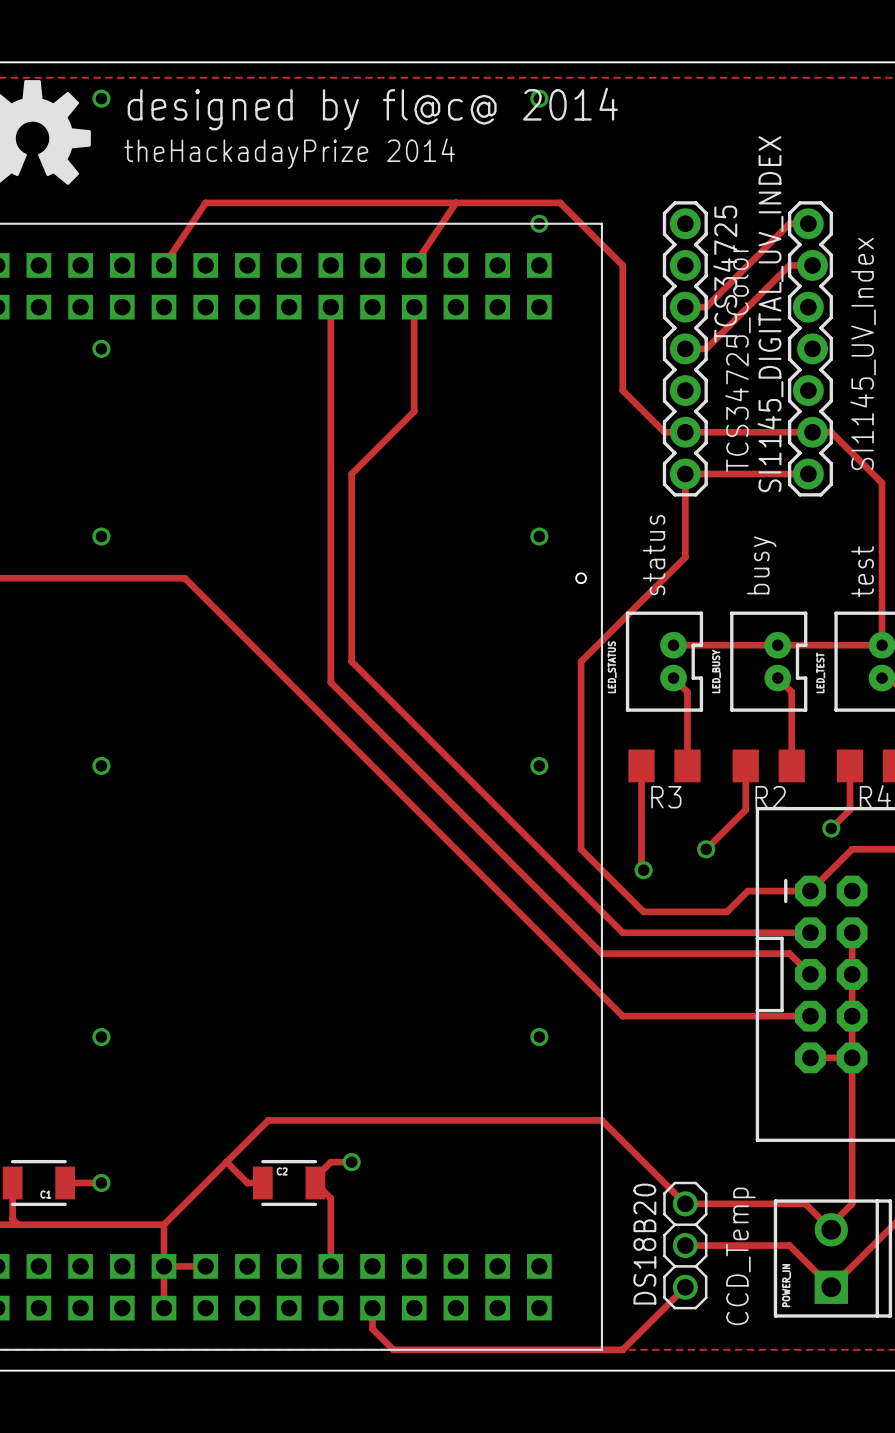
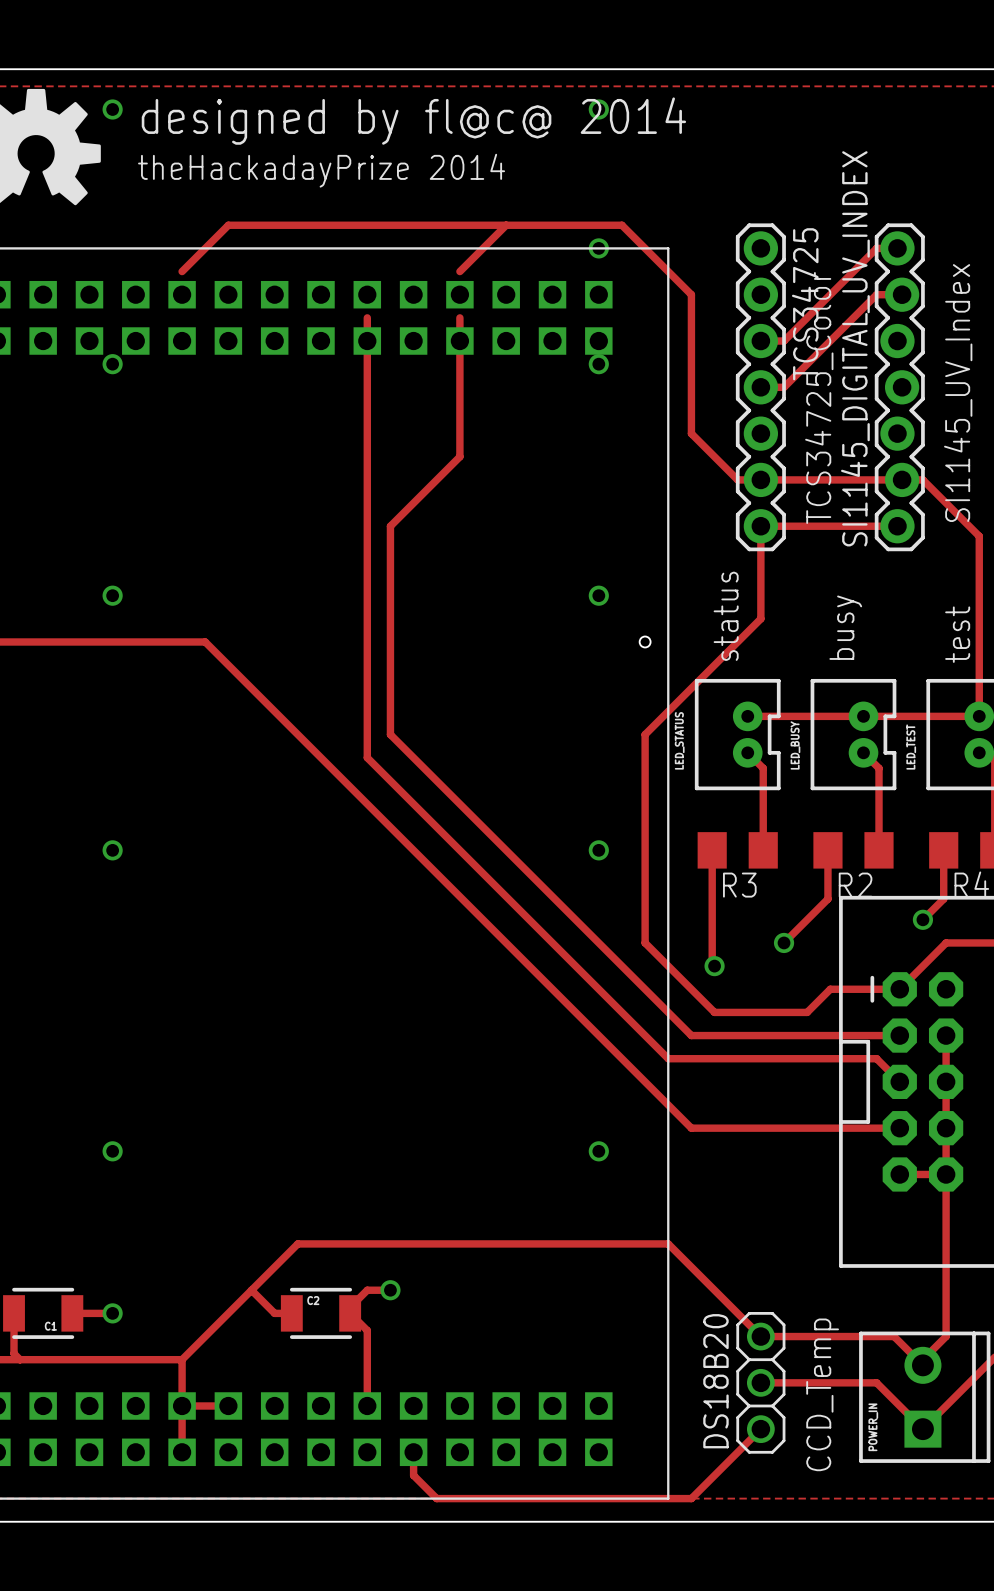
track: (205, 202) (164, 265) -> (228, 225) (182, 271)
track: (455, 202) (414, 265) -> (506, 225) (459, 271)
track: none -> (367, 317) (367, 341)
track: none -> (459, 317) (459, 341)
via: none -> (598, 364)
via position: (101, 348) -> (112, 364)

